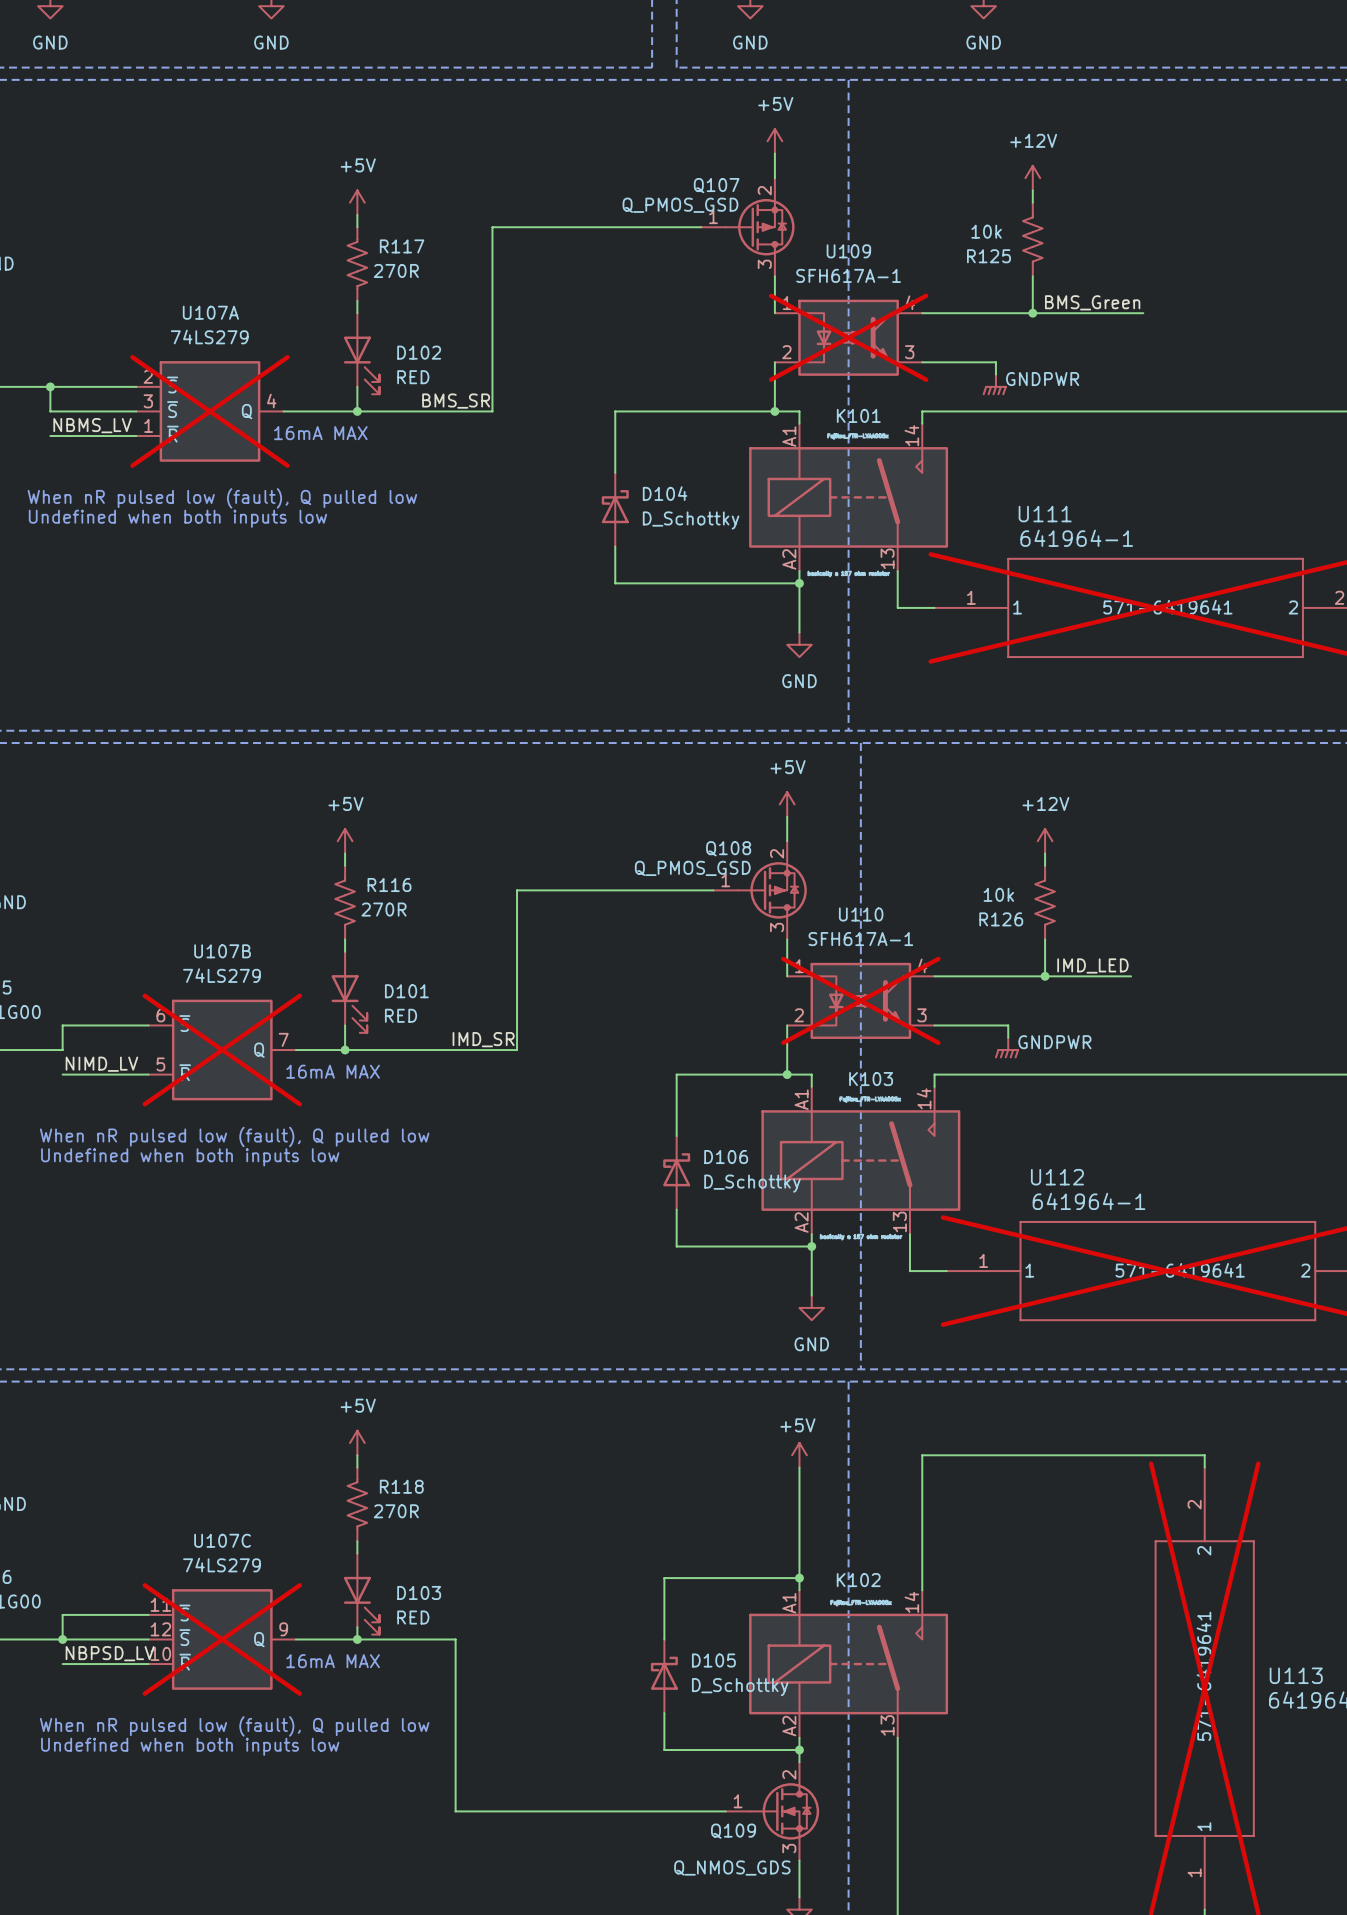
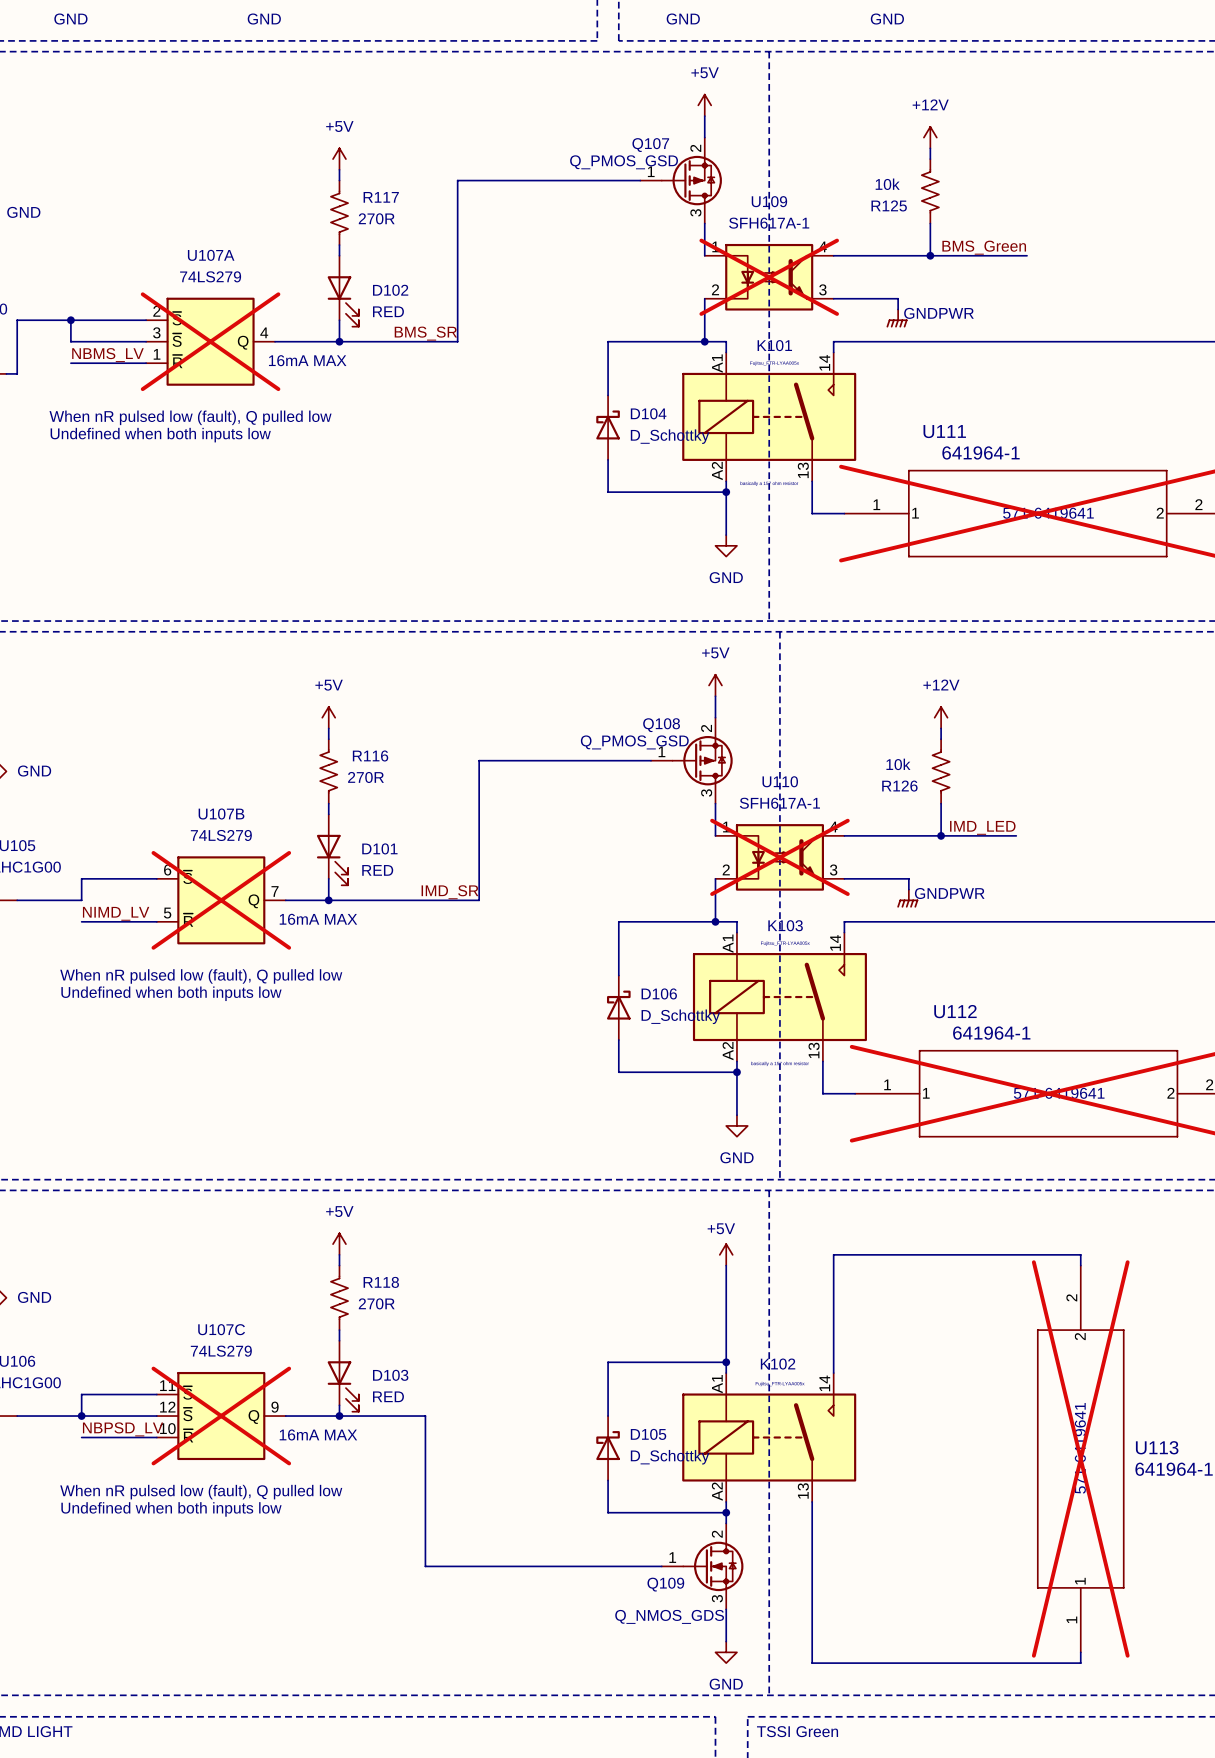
wire: (664, 411) (615, 411) (615, 472) -> (608, 341) (608, 395)
D104 position: (615, 509) -> (608, 427)
wire: (615, 546) (615, 583) (664, 583) -> (608, 459) (608, 492)

